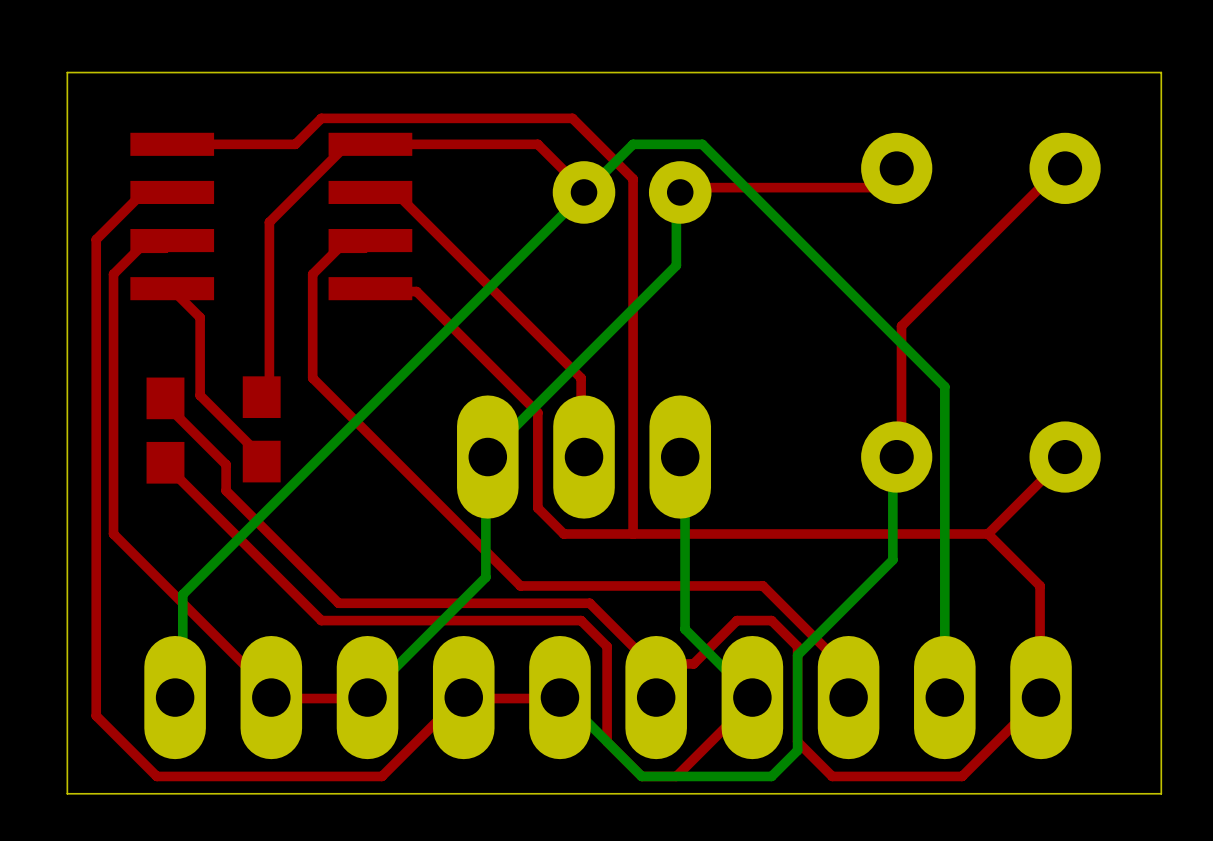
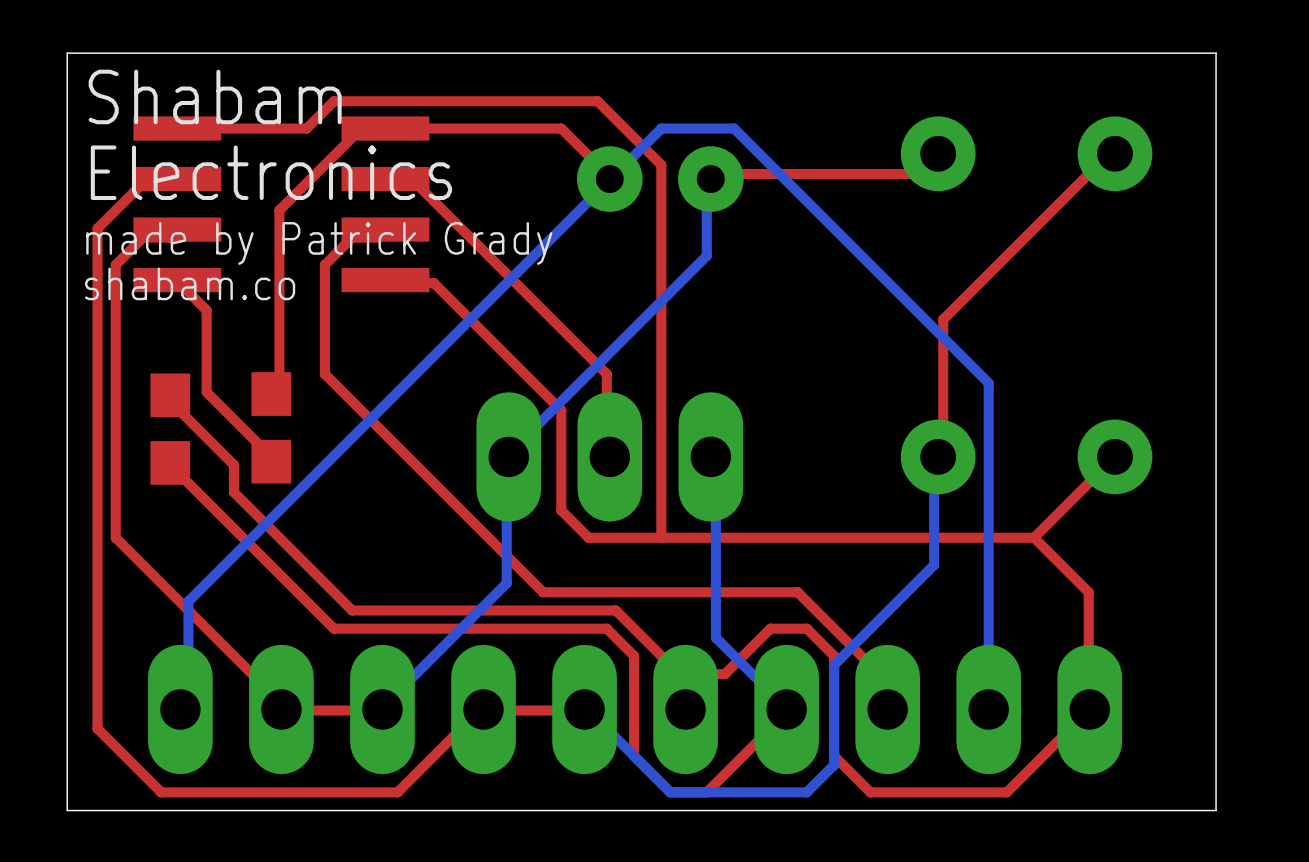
text: none -> Shabam (215, 96)
text: none -> Electronics (271, 172)
text: none -> made by Patrick Grady (319, 243)
text: none -> shabam.co (190, 283)

